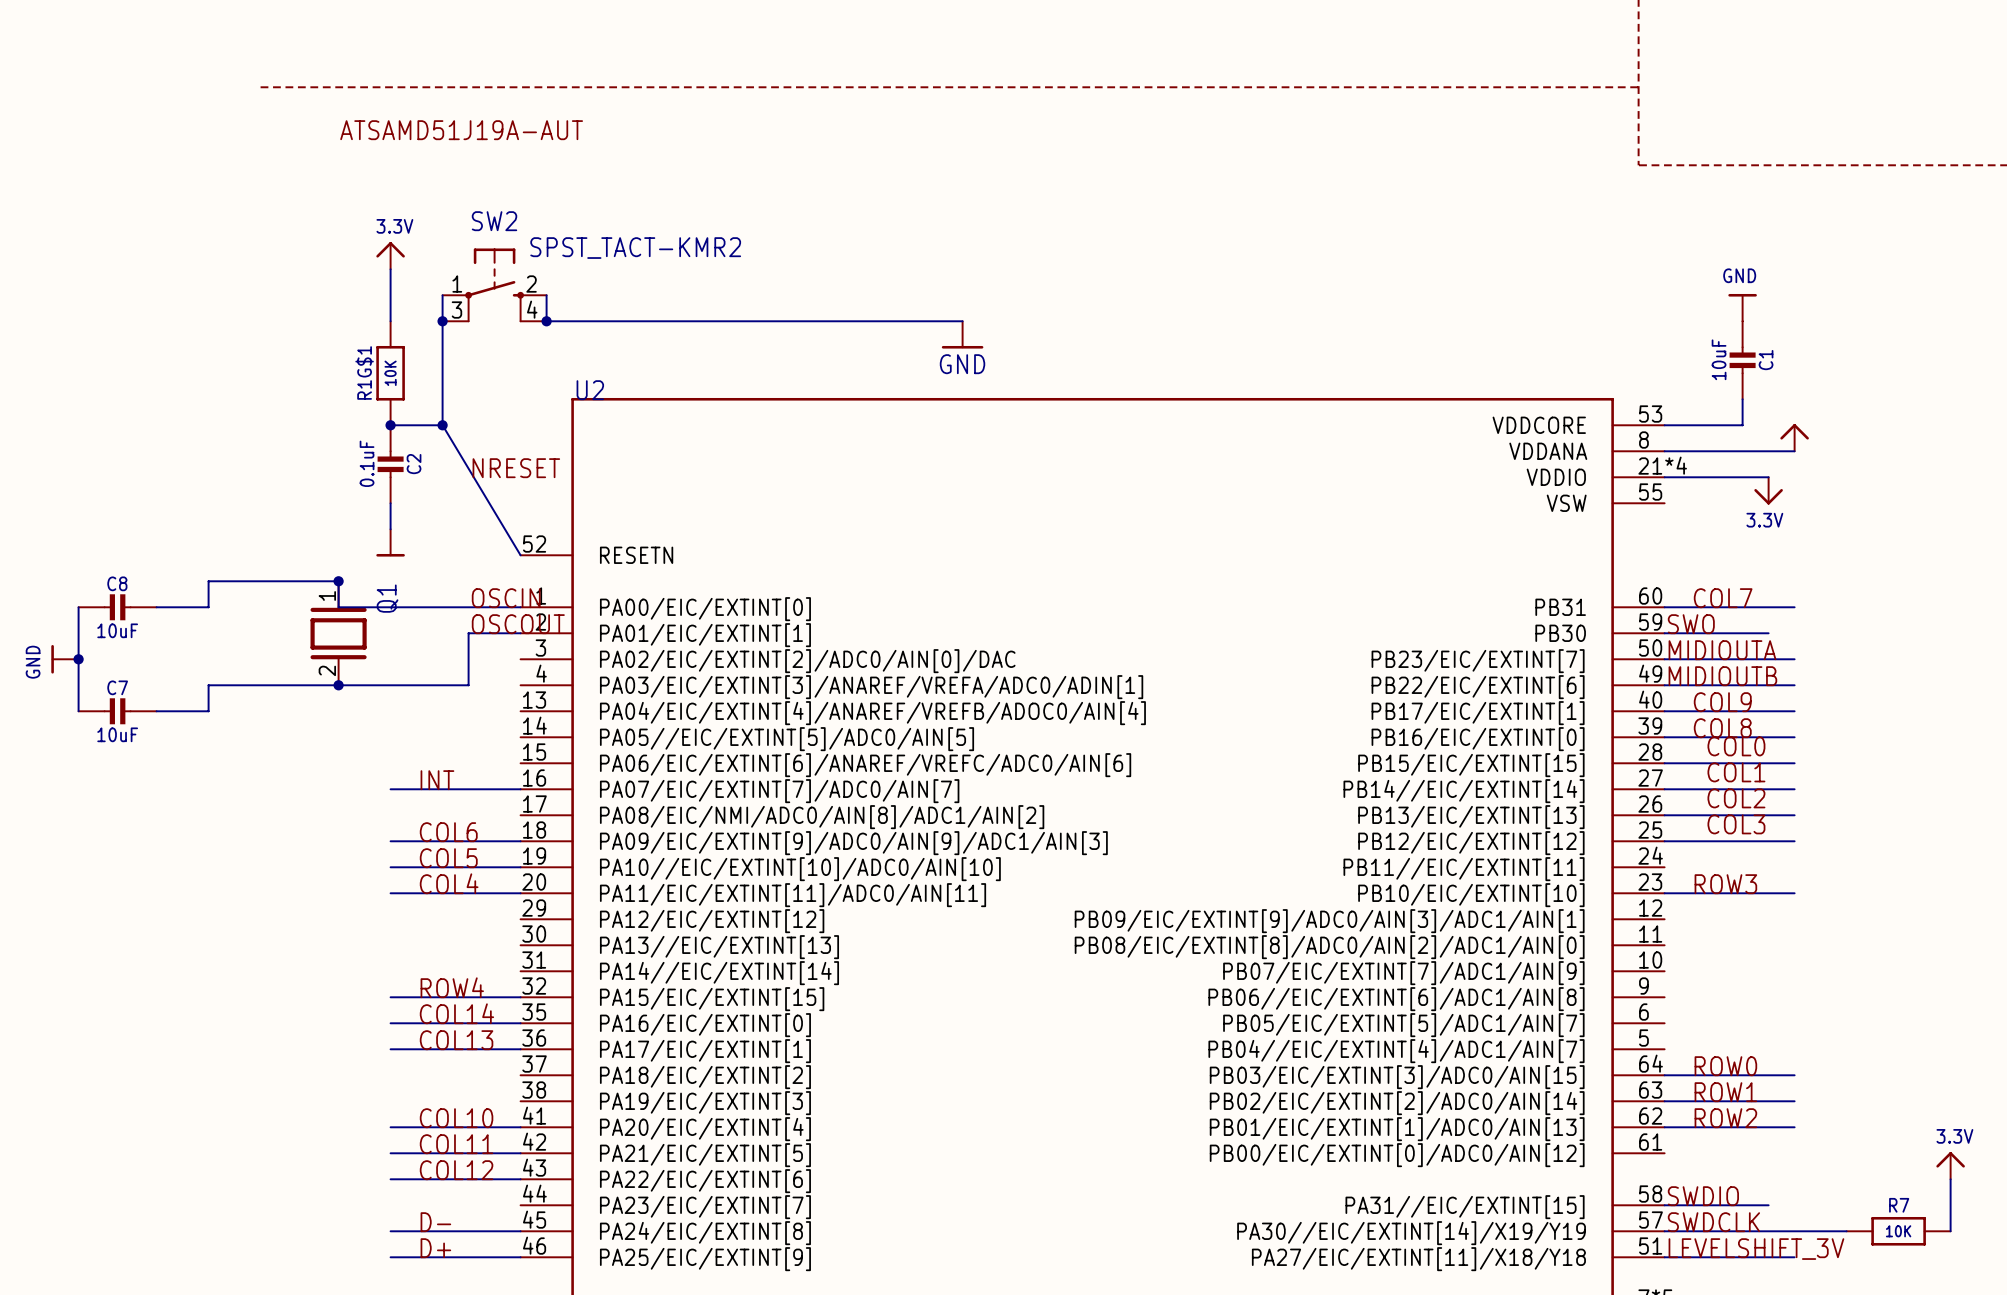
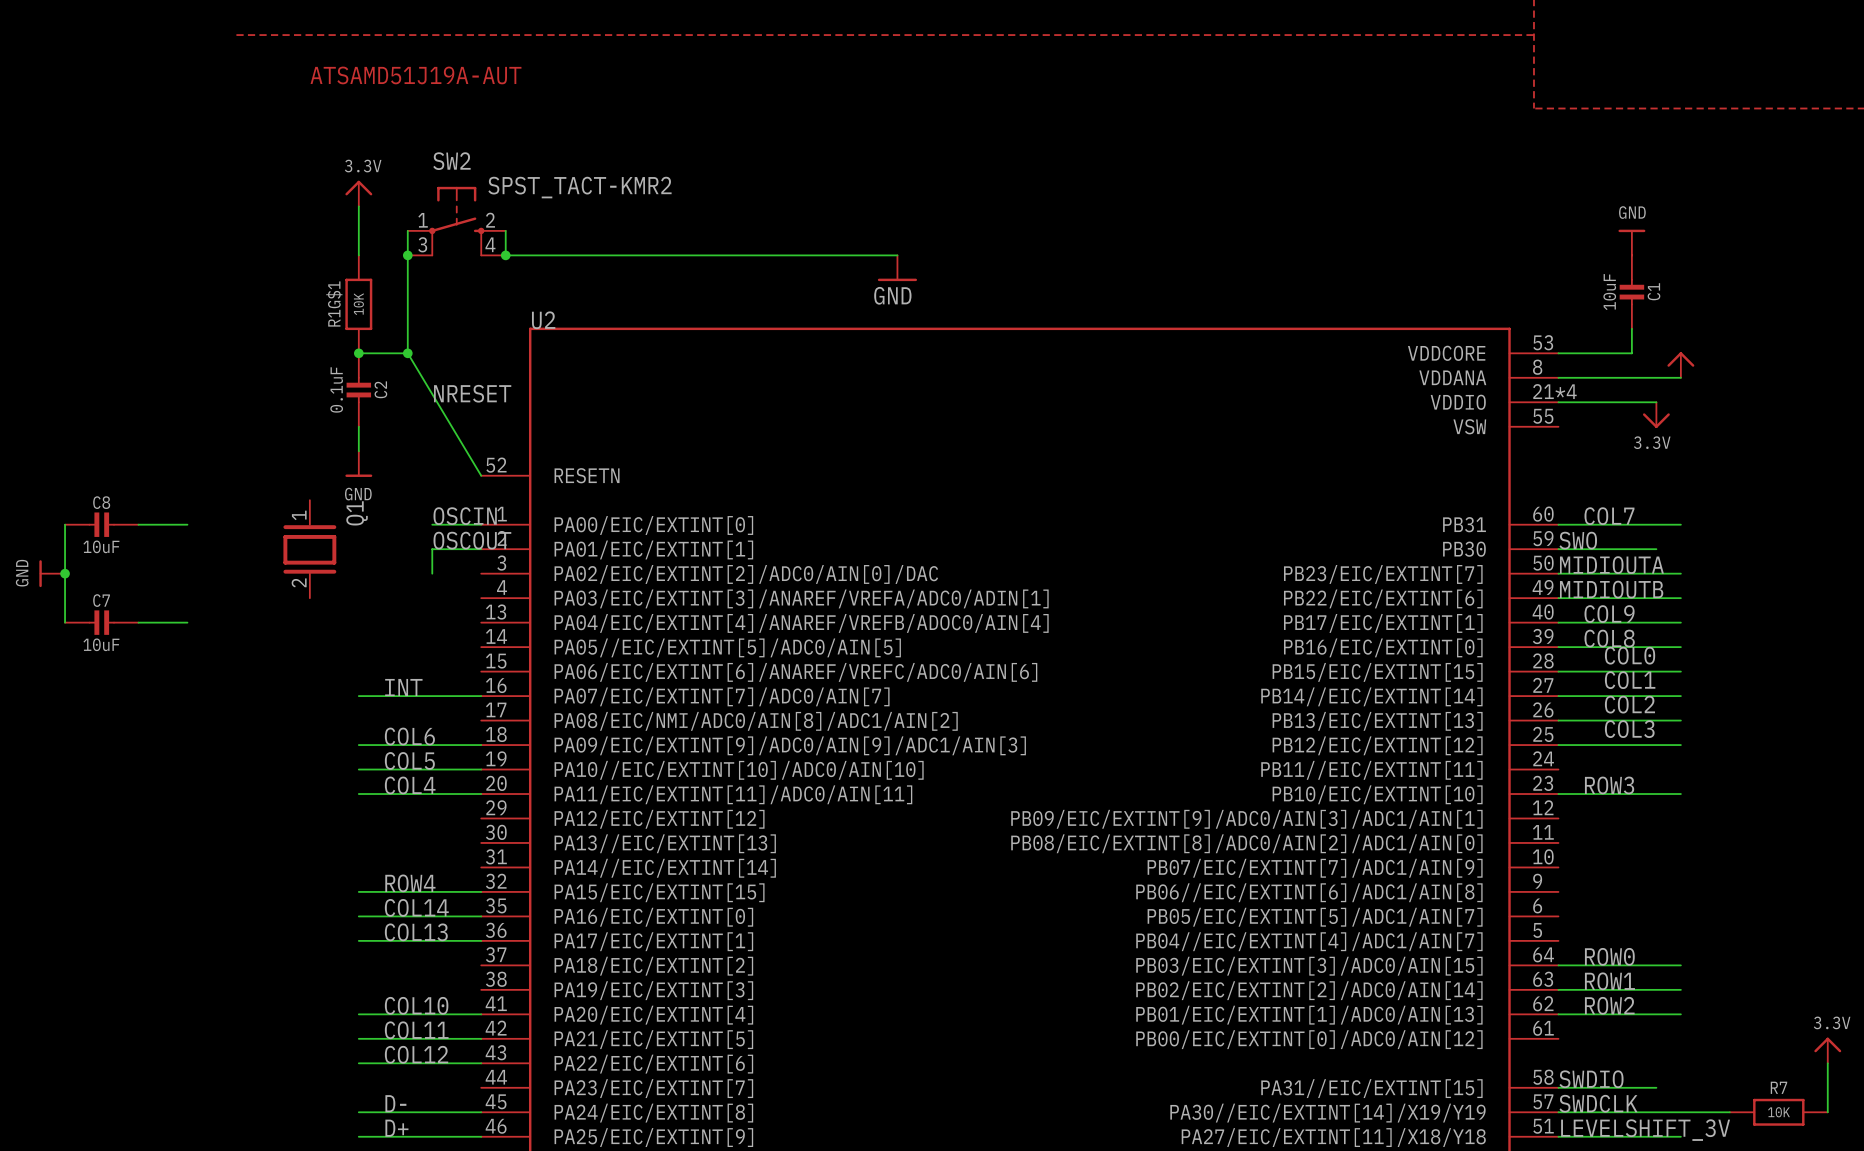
power symbol text: none -> GND (358, 494)
junction: (338, 581) -> none
wire: (208, 607) (208, 581) (338, 581) (338, 607) (468, 607) -> none
wire: (468, 659) (468, 685) (208, 685) (208, 711) -> none
junction: (338, 685) -> none

